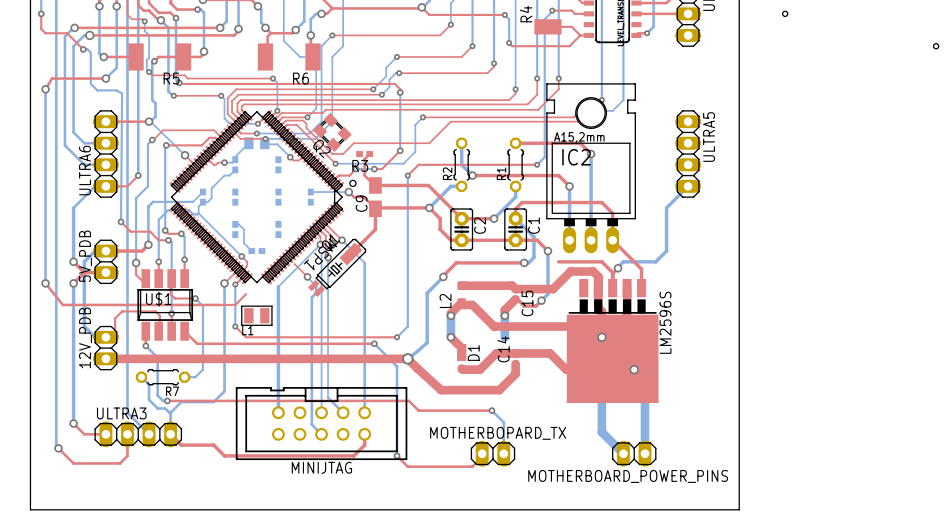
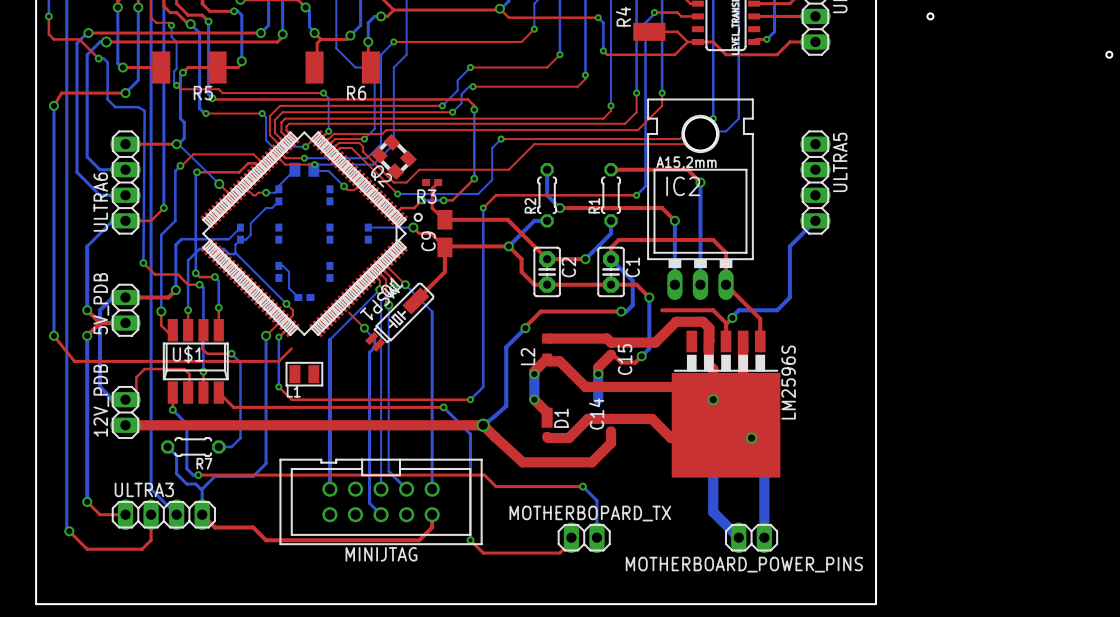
top track: none -> (697, 41) (713, 41) (726, 54) (777, 54) (789, 41) (815, 41)

